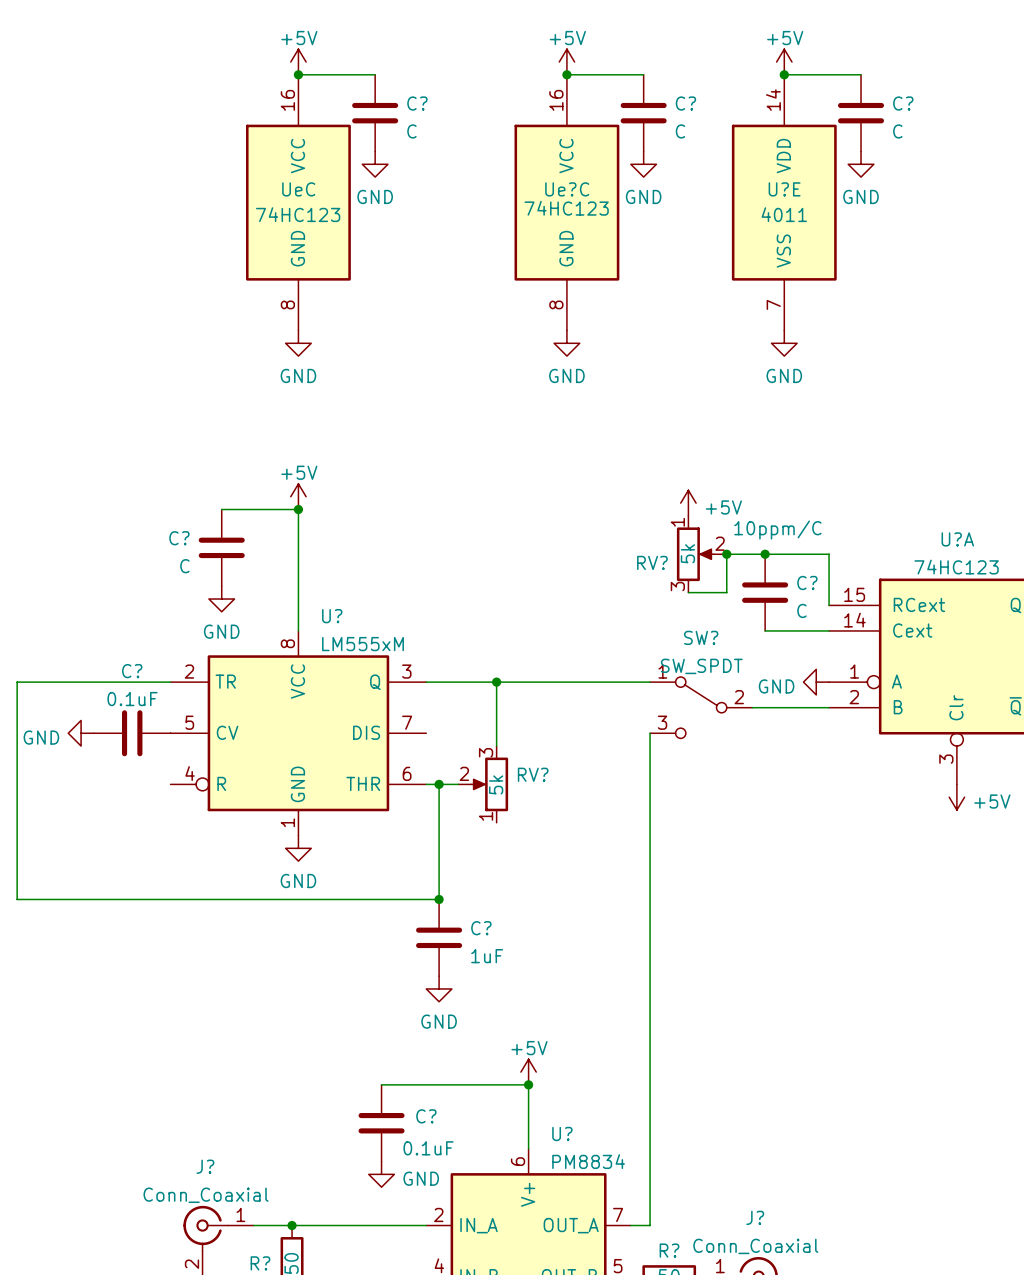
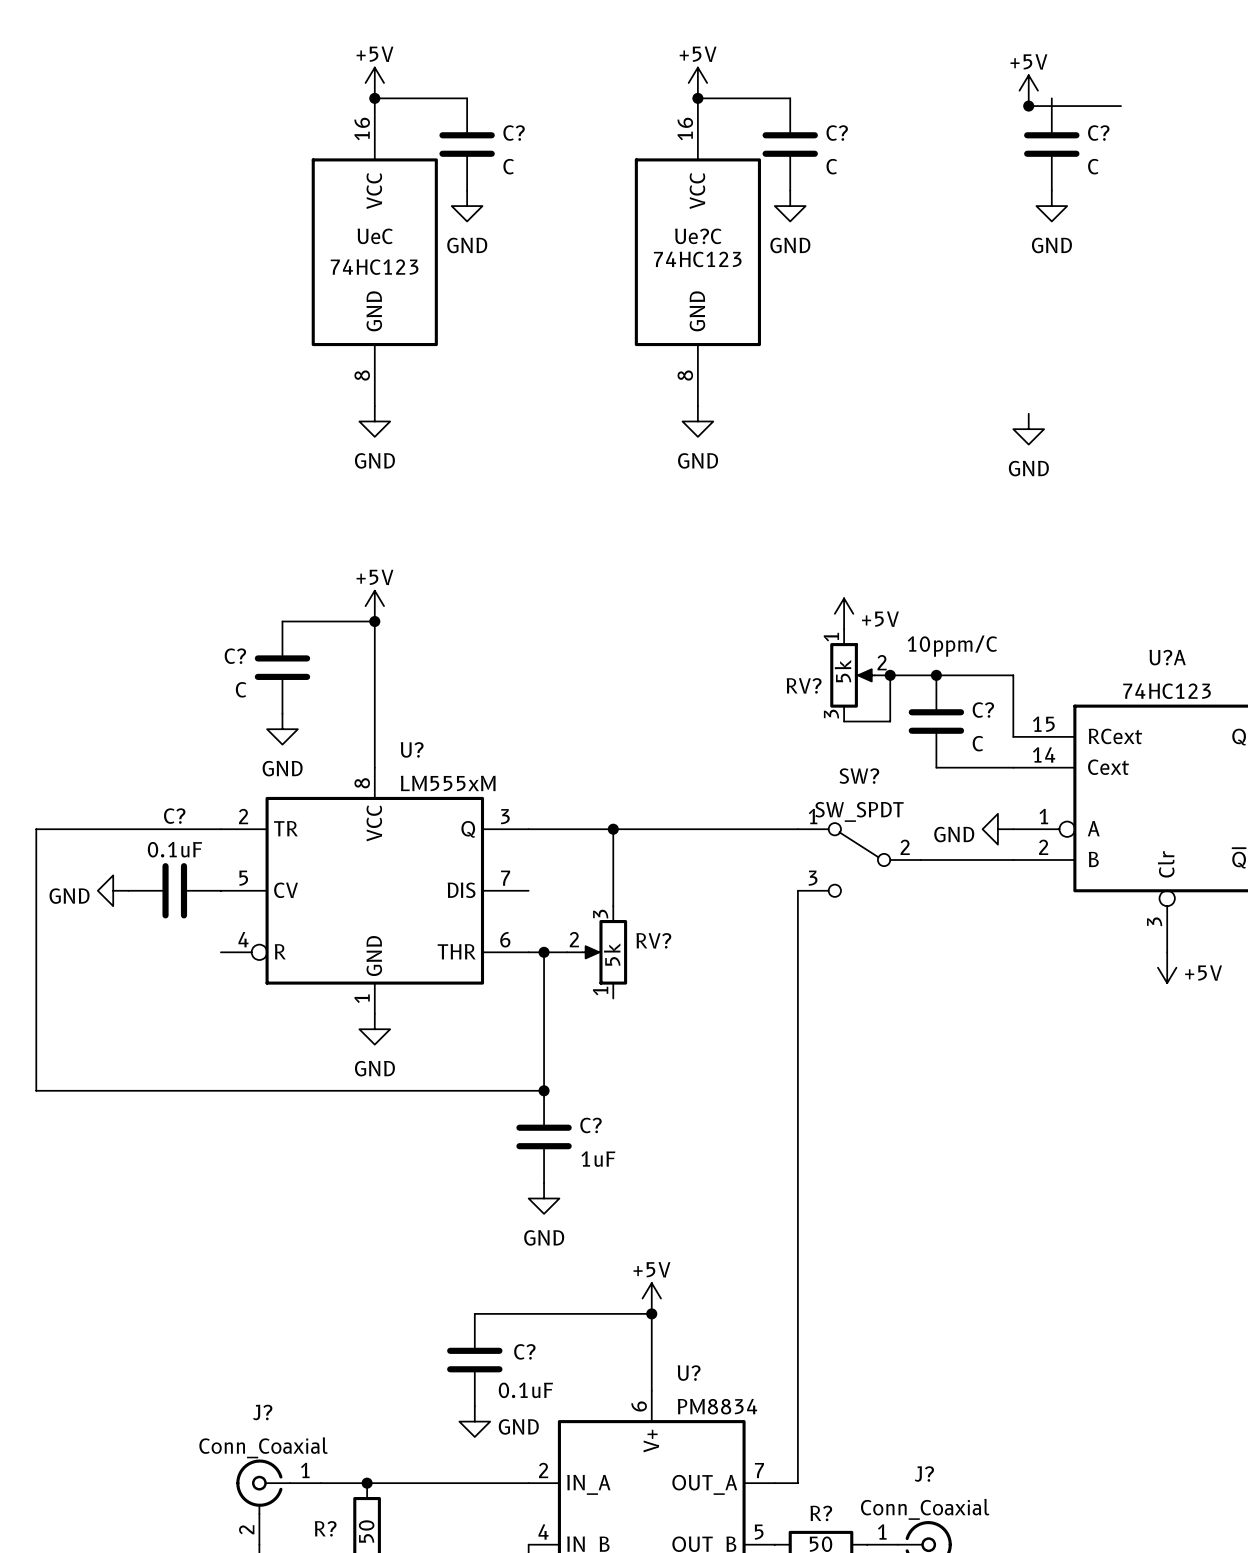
power symbol position: +5V (784, 62) -> +5V (1028, 90)
wire: (784, 74) (861, 74) -> (1028, 106) (1121, 106)
junction position: (784, 74) -> (1028, 106)
U?E: 4011 (784, 202) -> none
power symbol position: GND (784, 343) -> GND (1028, 429)

